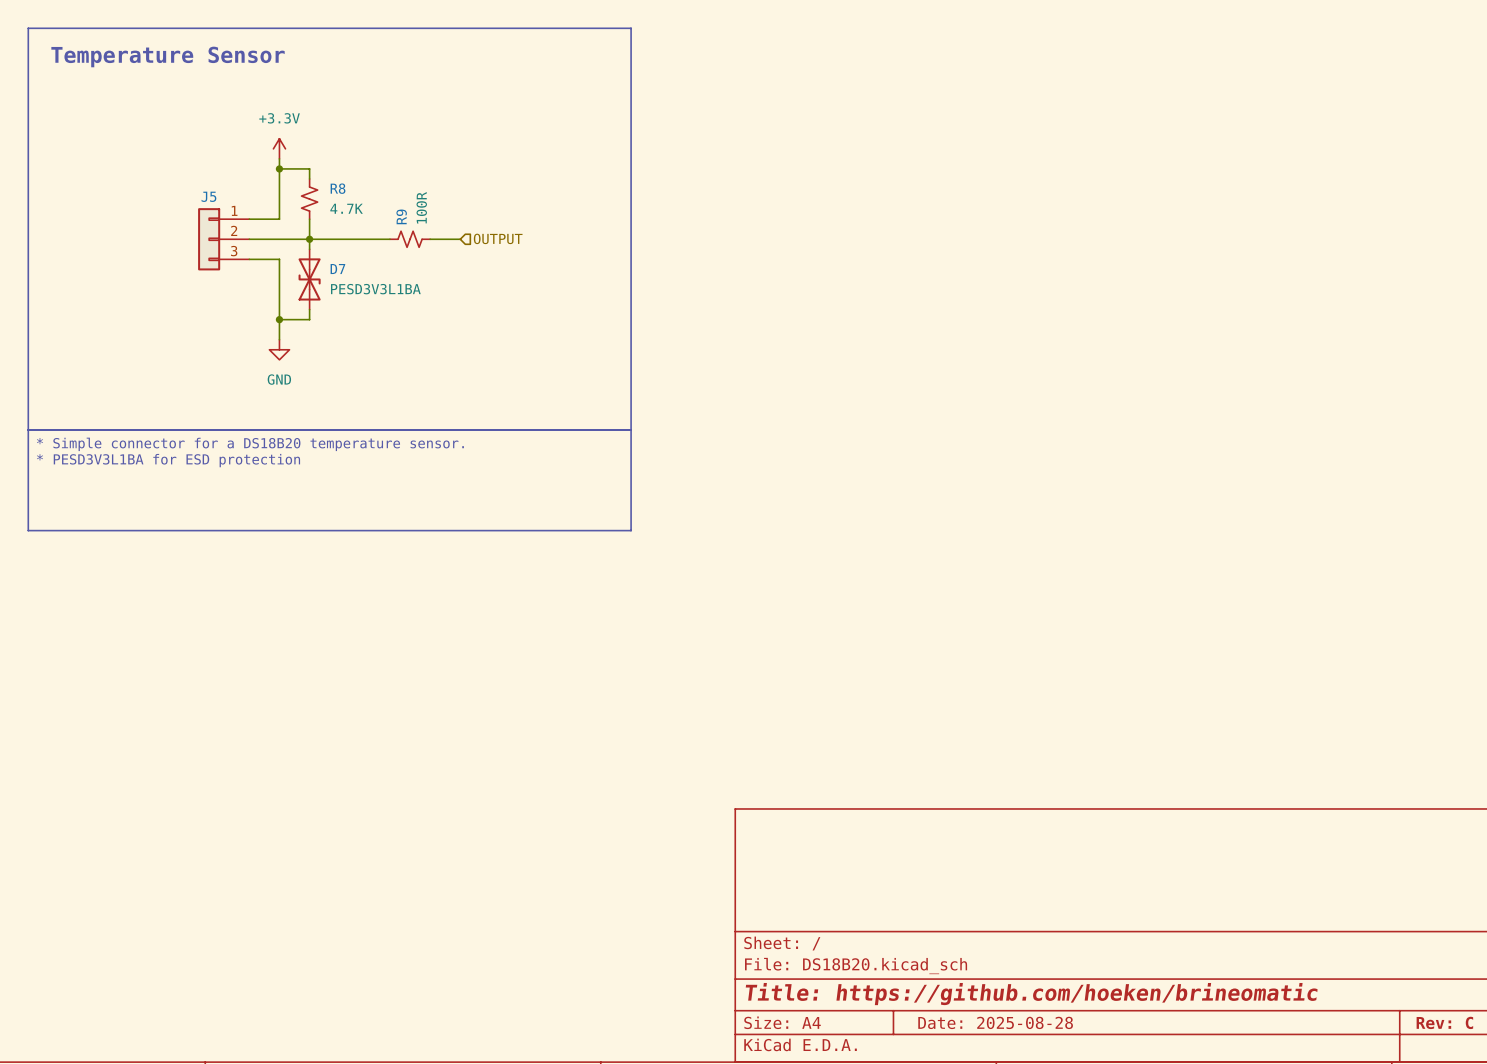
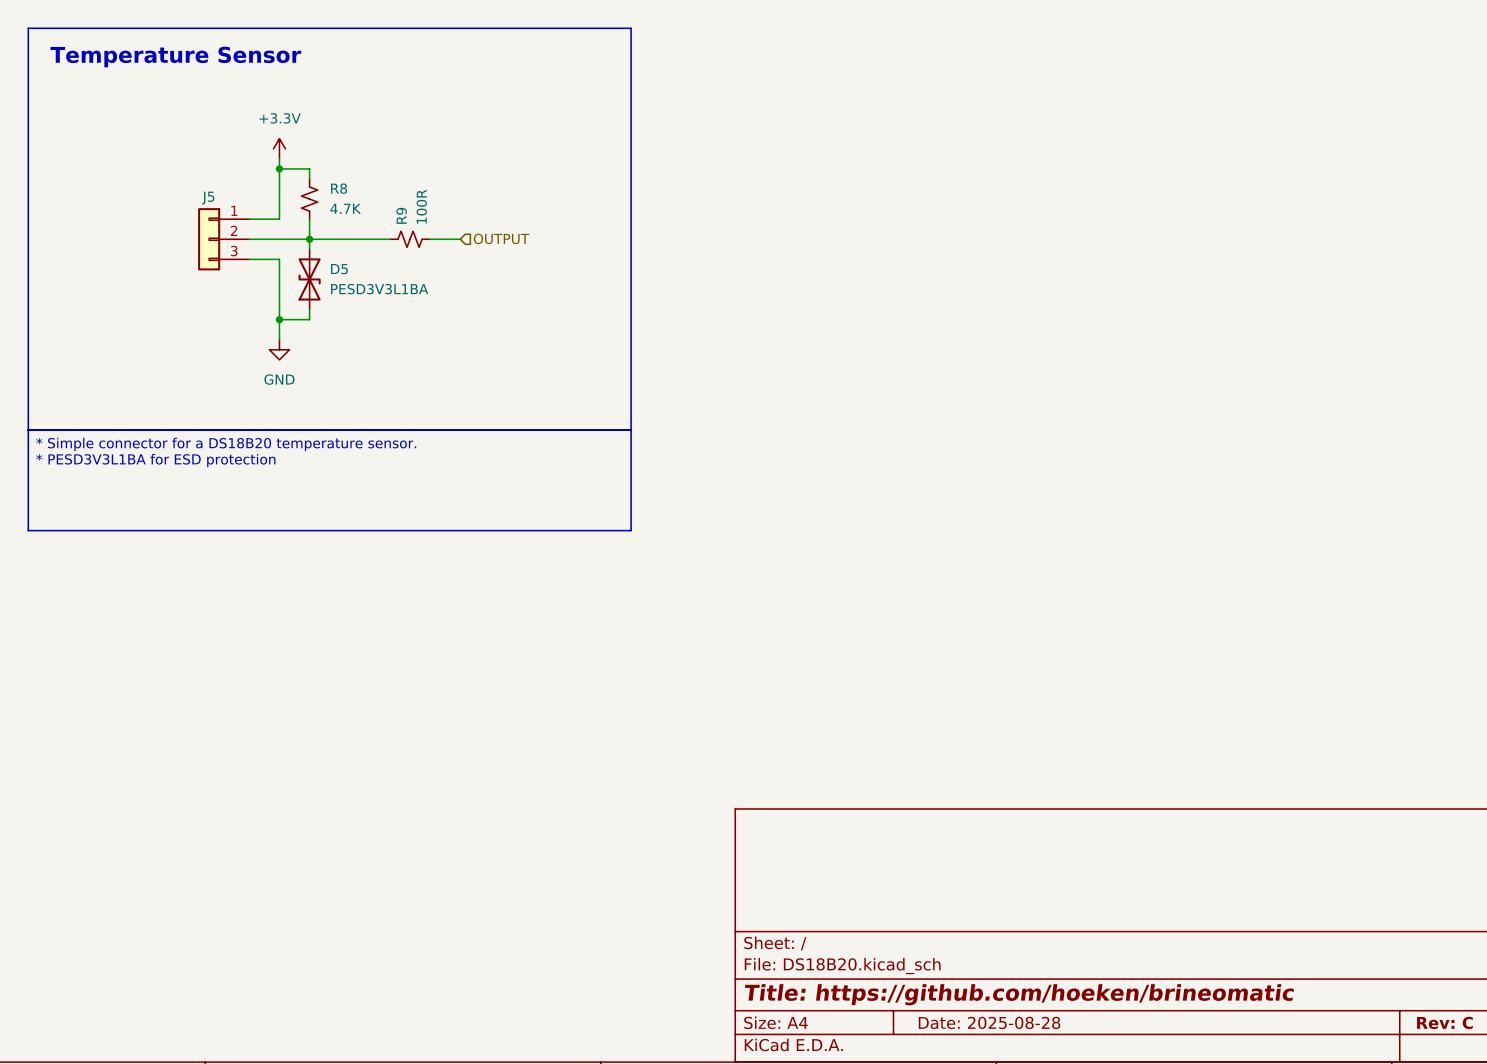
D7 name: D7 (337, 269) -> D5 (339, 269)

